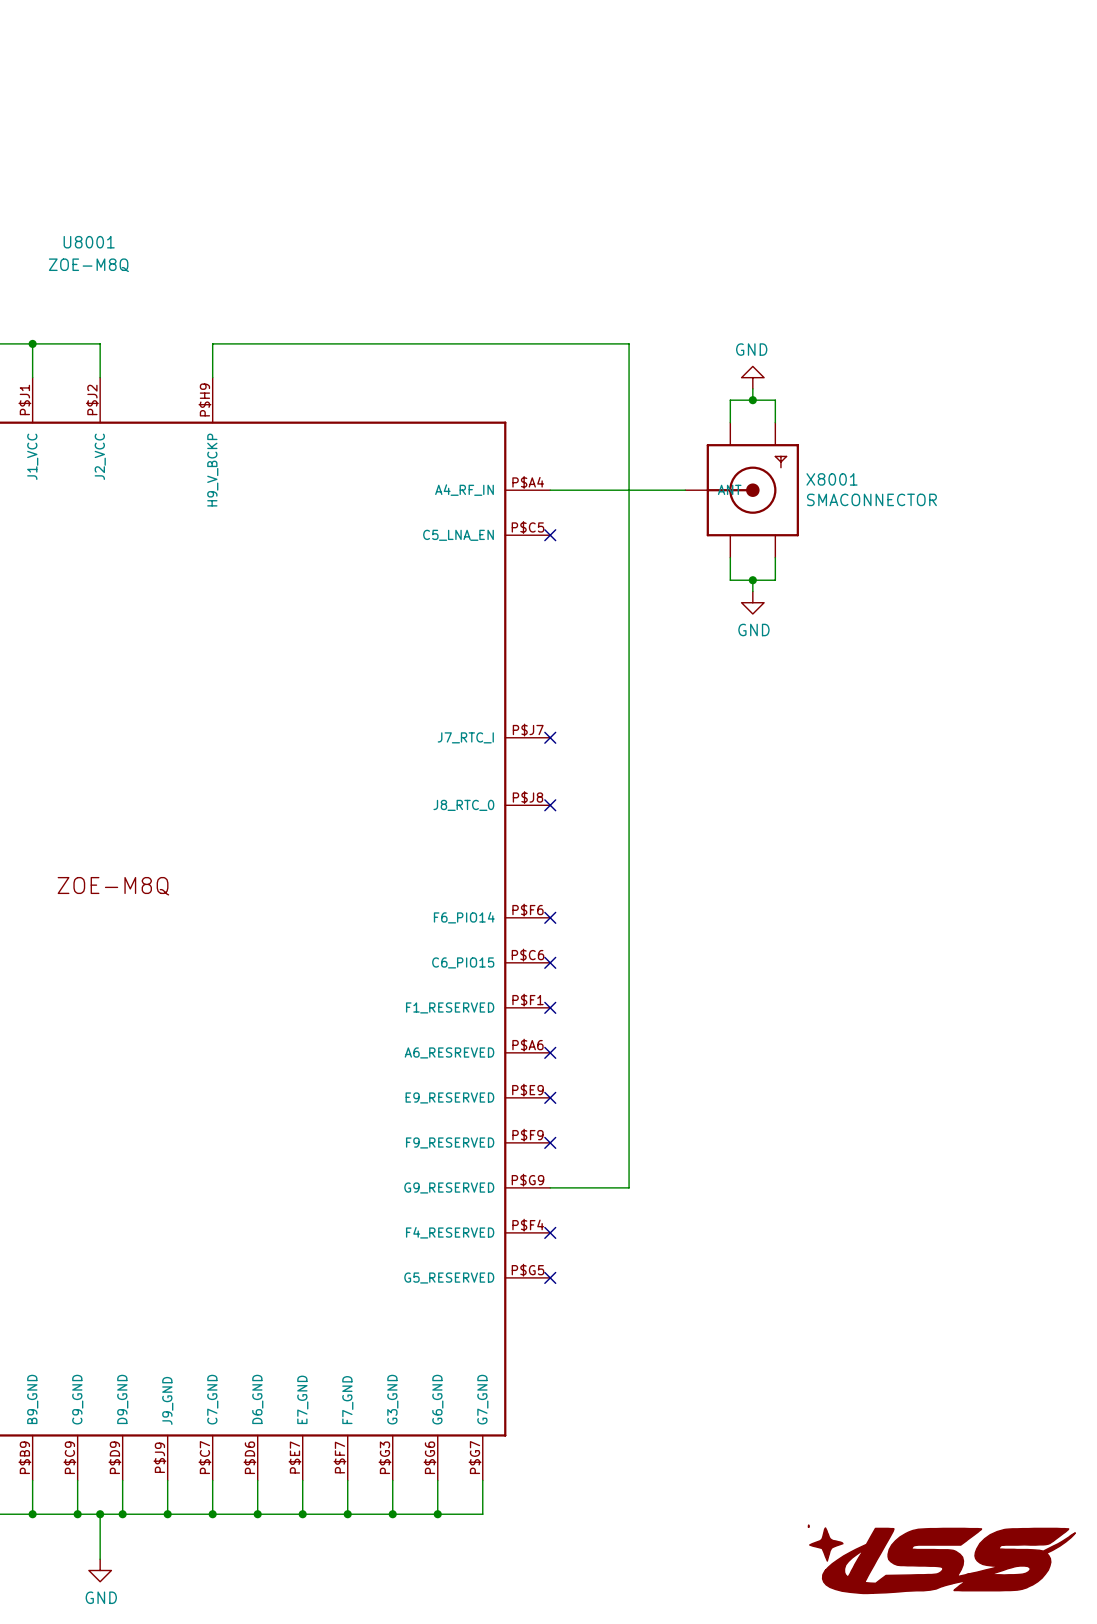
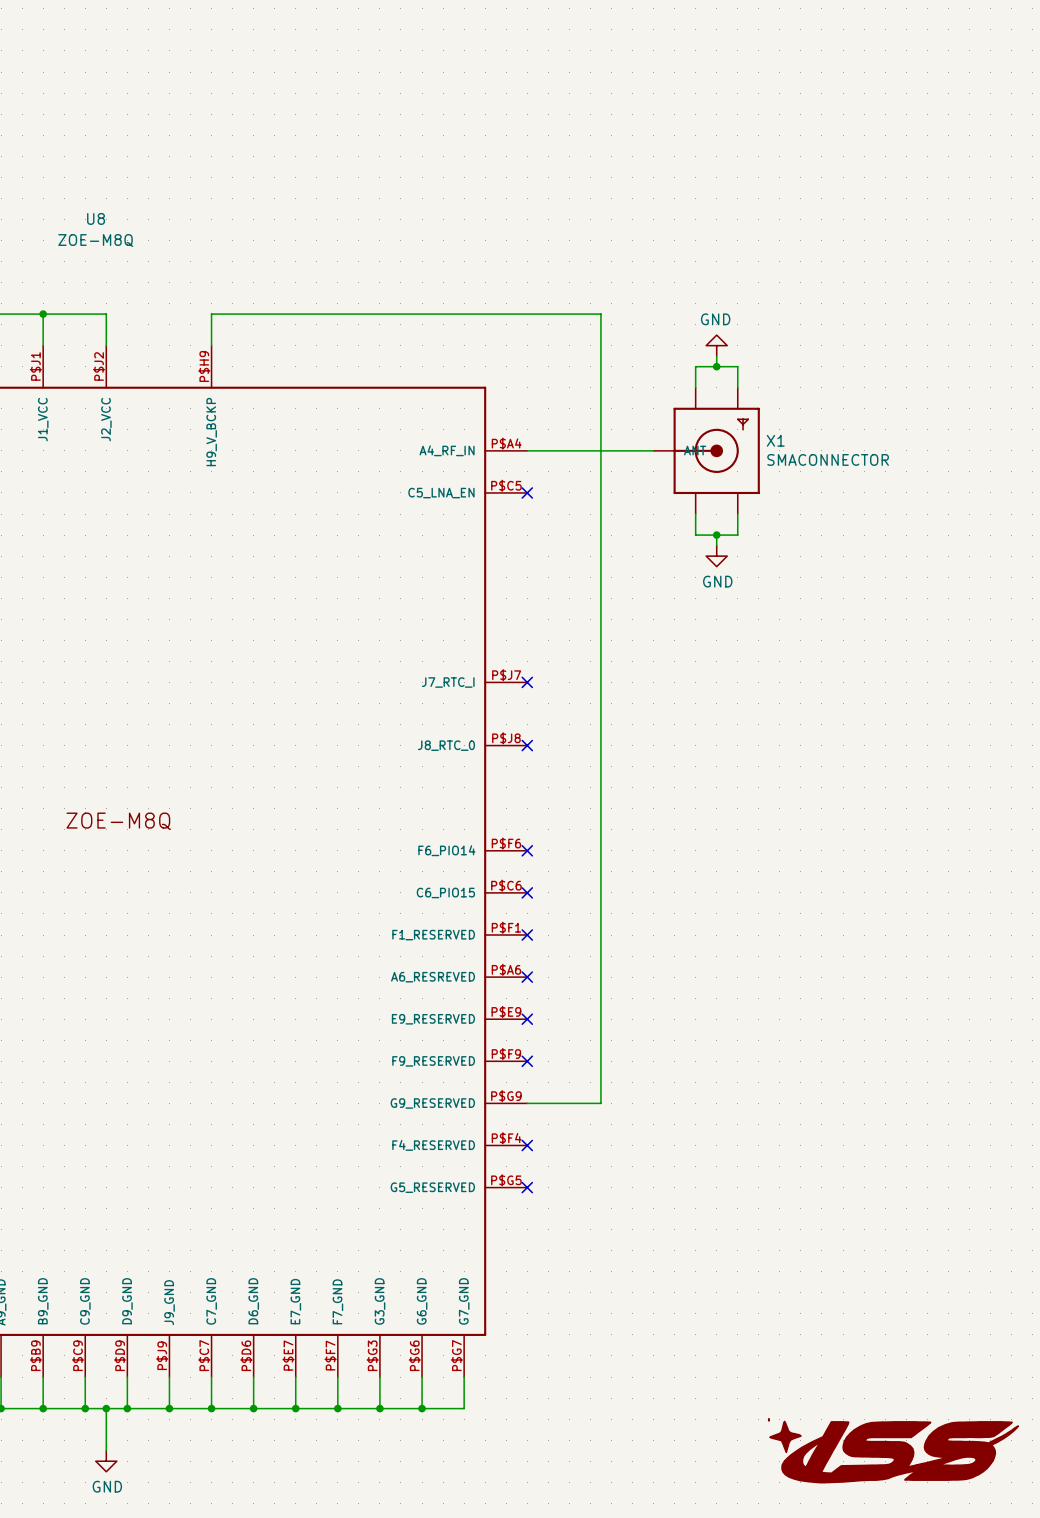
U8001 name: U8001 (89, 242) -> U8 (96, 218)
X8001 name: X8001 (832, 479) -> X1 (775, 440)

